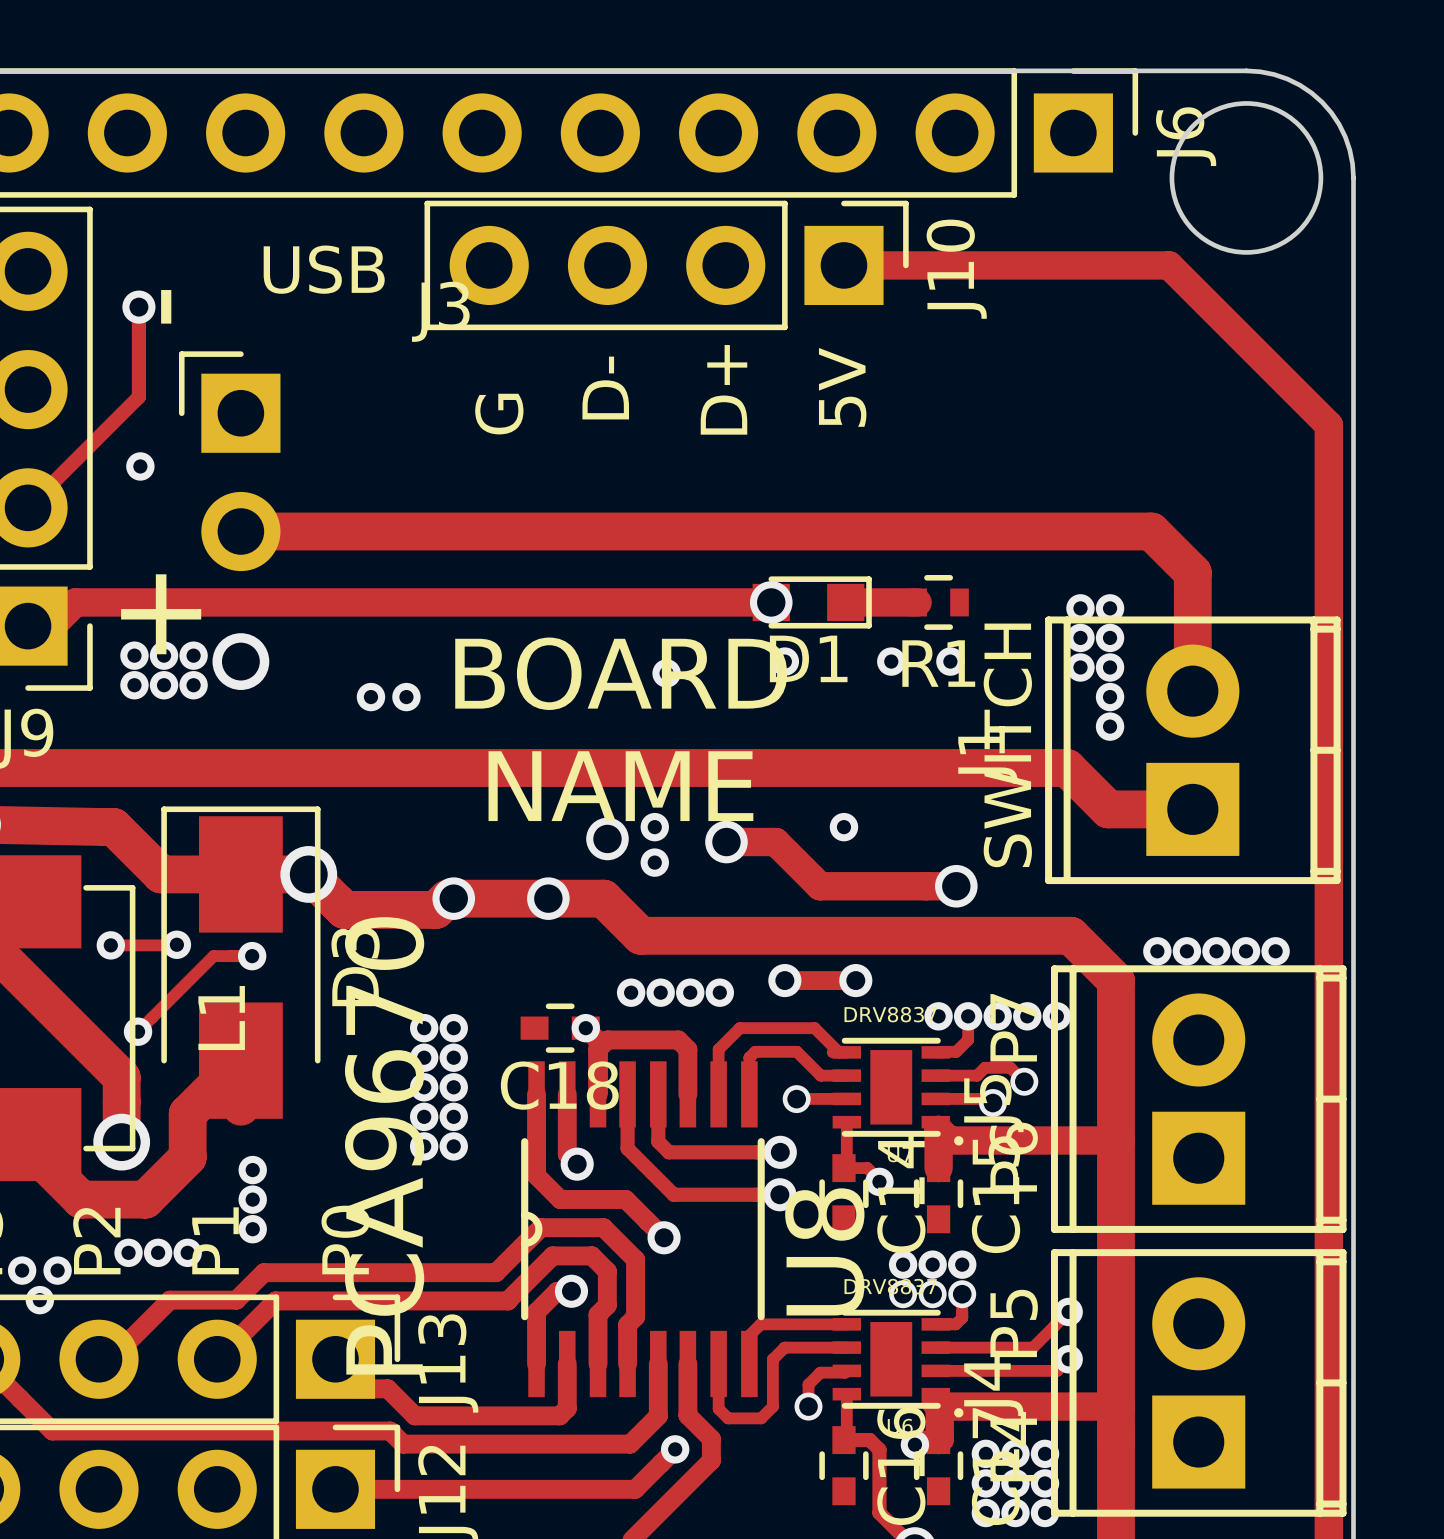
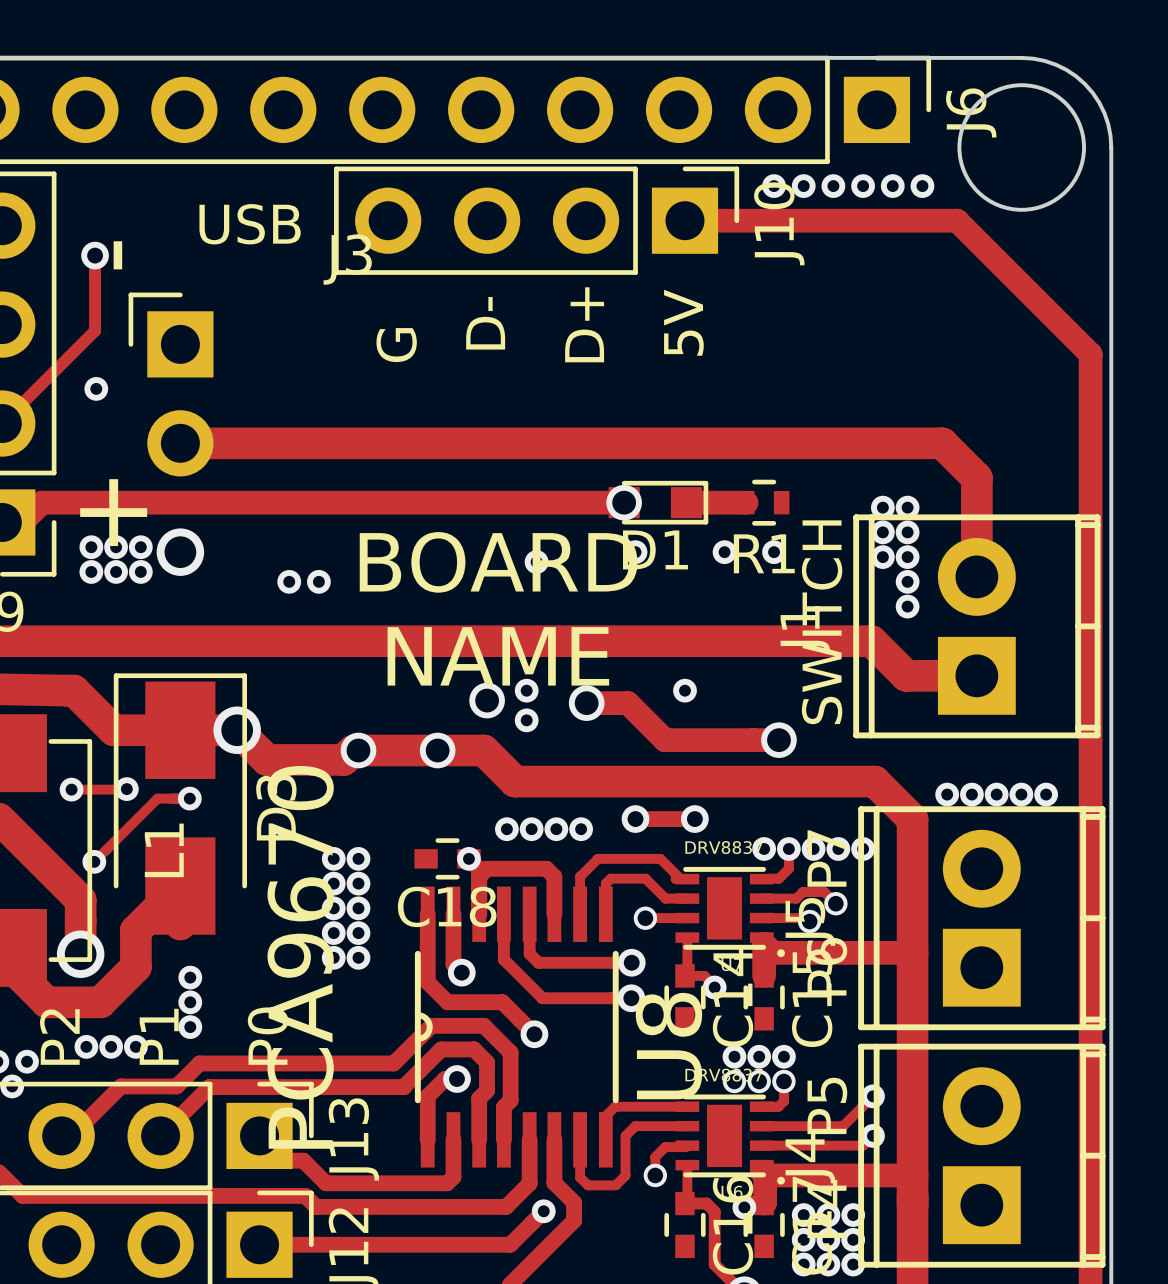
via: none -> (774, 186)
via: none -> (803, 186)
via: none -> (833, 186)
via: none -> (863, 186)
via: none -> (892, 186)
via: none -> (922, 186)

